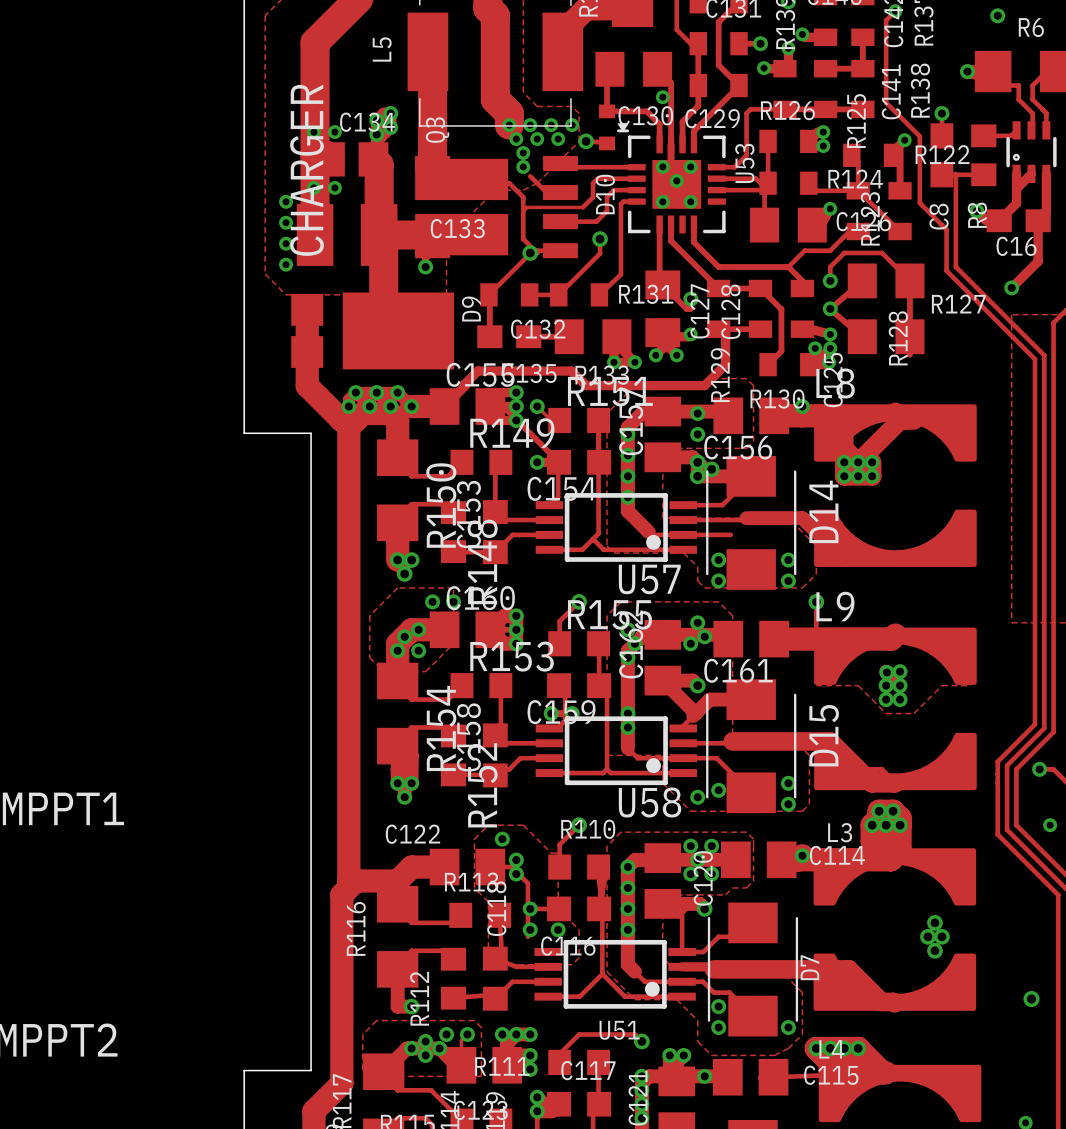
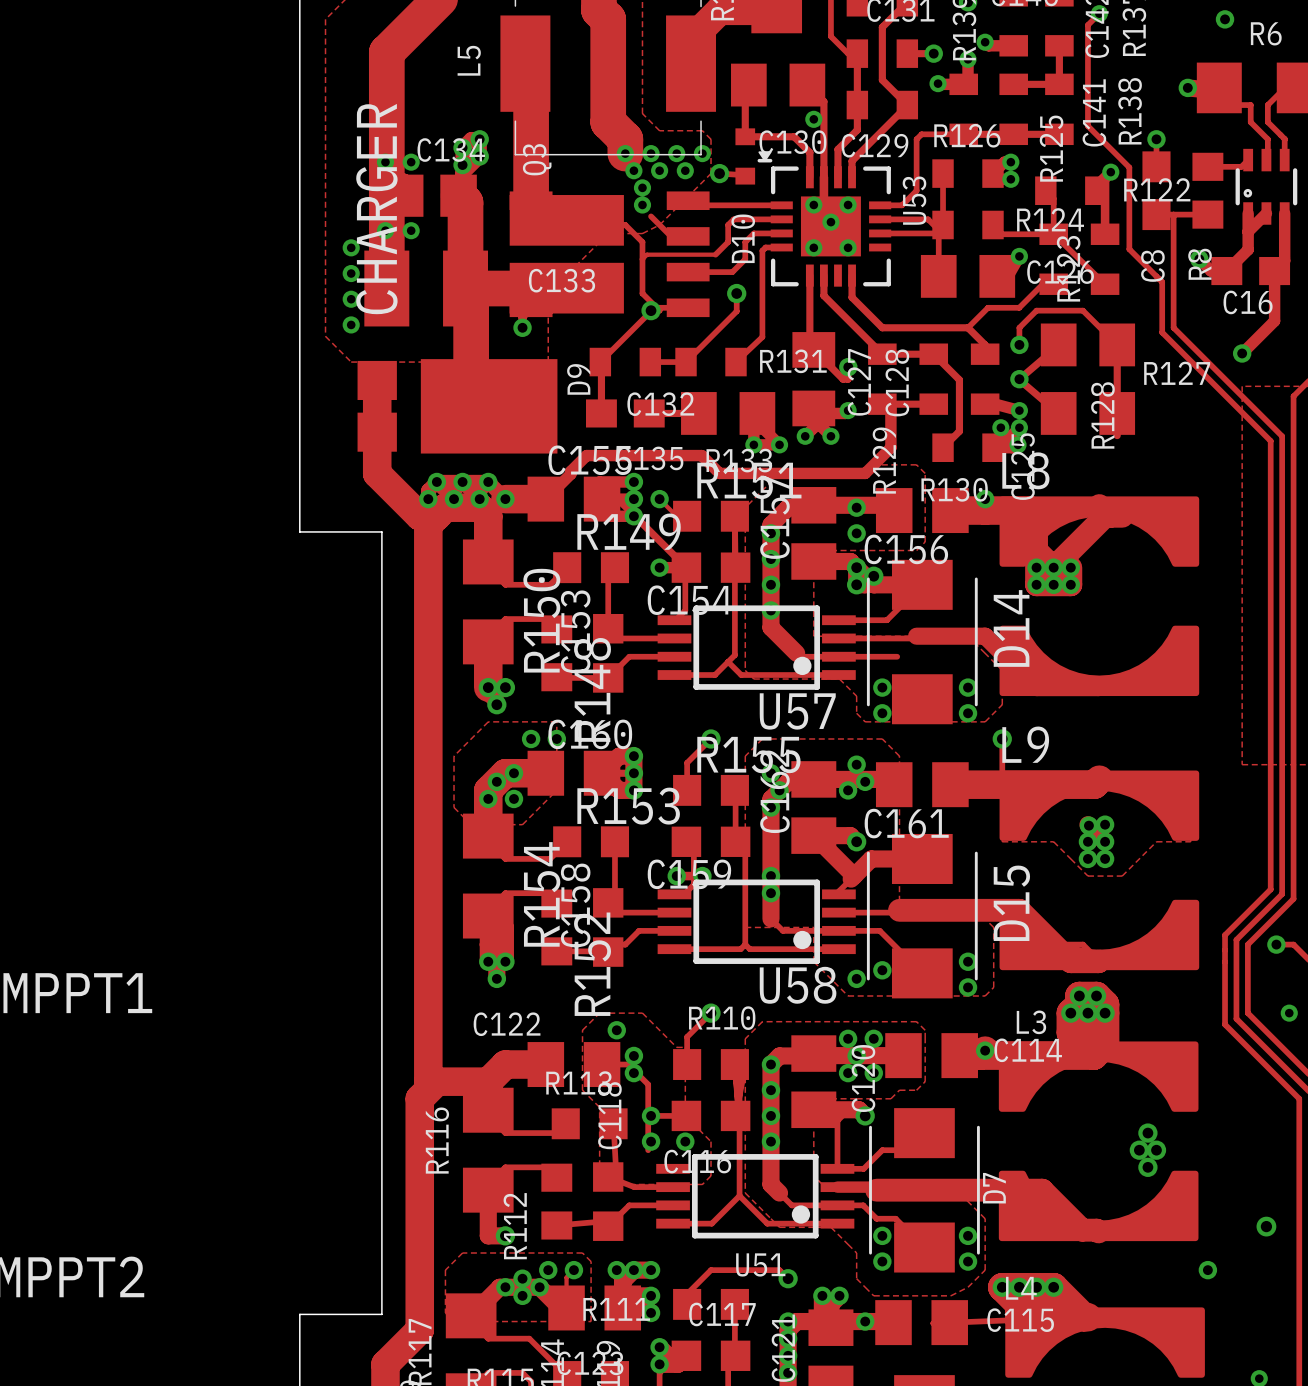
via: none -> (968, 1235)
via: none -> (1207, 1270)

